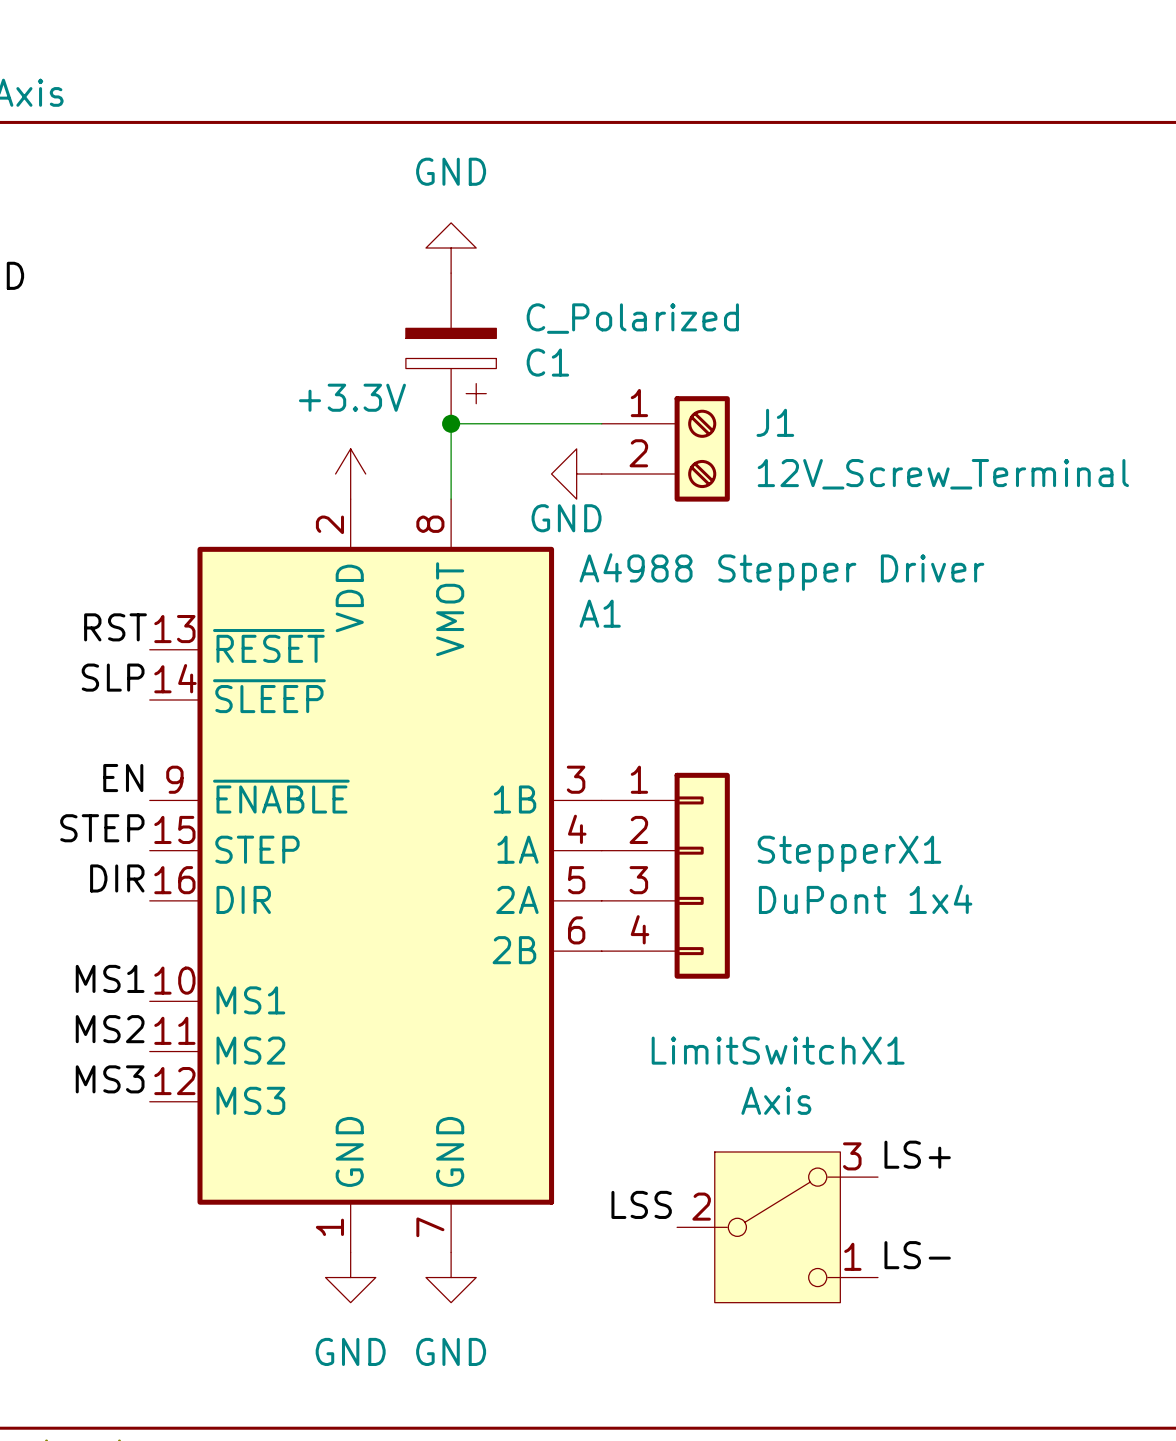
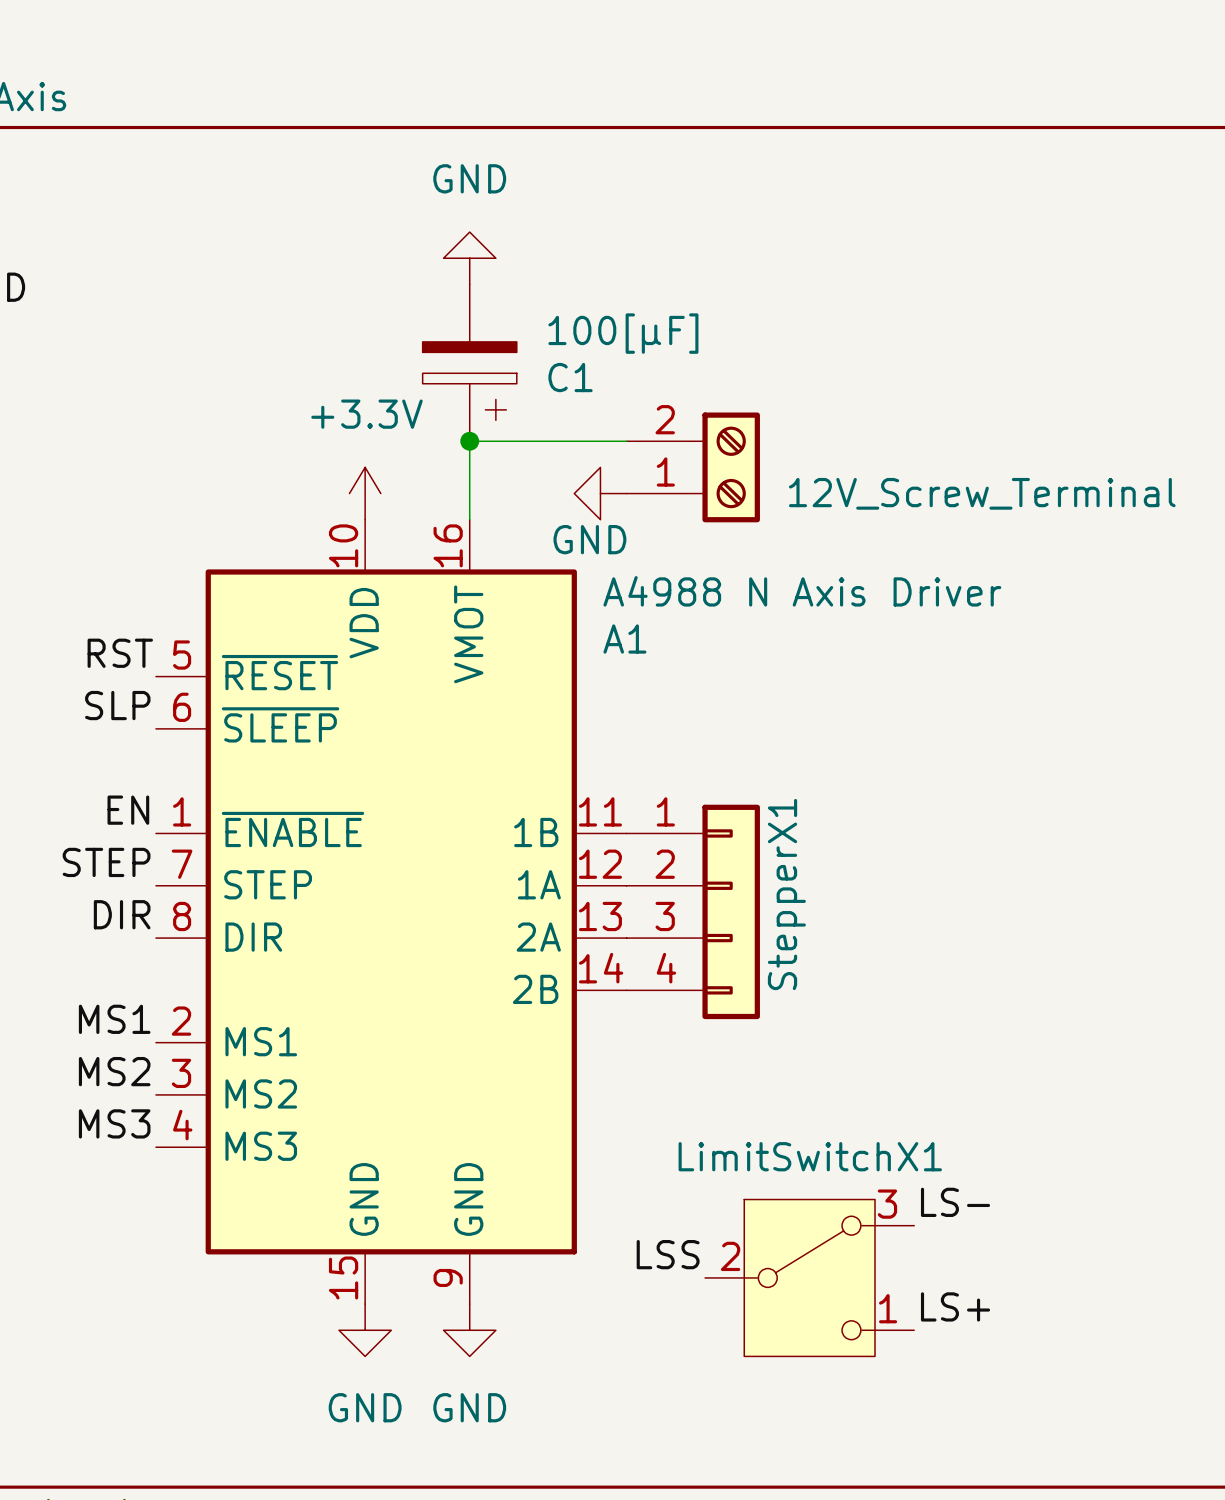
C1 value: C_Polarized (632, 318) -> 100[µF] (623, 333)
J1 pin number: 1 (639, 403) -> 2 (665, 419)
J1 name: J1 (775, 422) -> none
J1 pin number: 2 (638, 453) -> 1 (665, 471)
A1 symbol: [149, 499, 602, 1253] -> [155, 519, 627, 1305]
A1 value: A4988 Stepper Driver (781, 572) -> A4988 N Axis Driver (802, 591)
StepperX1 name rotation: 0° (849, 853) -> 90° counterclockwise (786, 894)
StepperX1 value: DuPont 1x4 (865, 899) -> none
LimitSwitchX1 name position: LimitSwitchX1 (778, 1050) -> LimitSwitchX1 (810, 1156)
LimitSwitchX1 value: Axis (776, 1100) -> none
label: LS+ (917, 1154) -> LS- (955, 1202)
label: LS- (917, 1255) -> LS+ (955, 1306)

